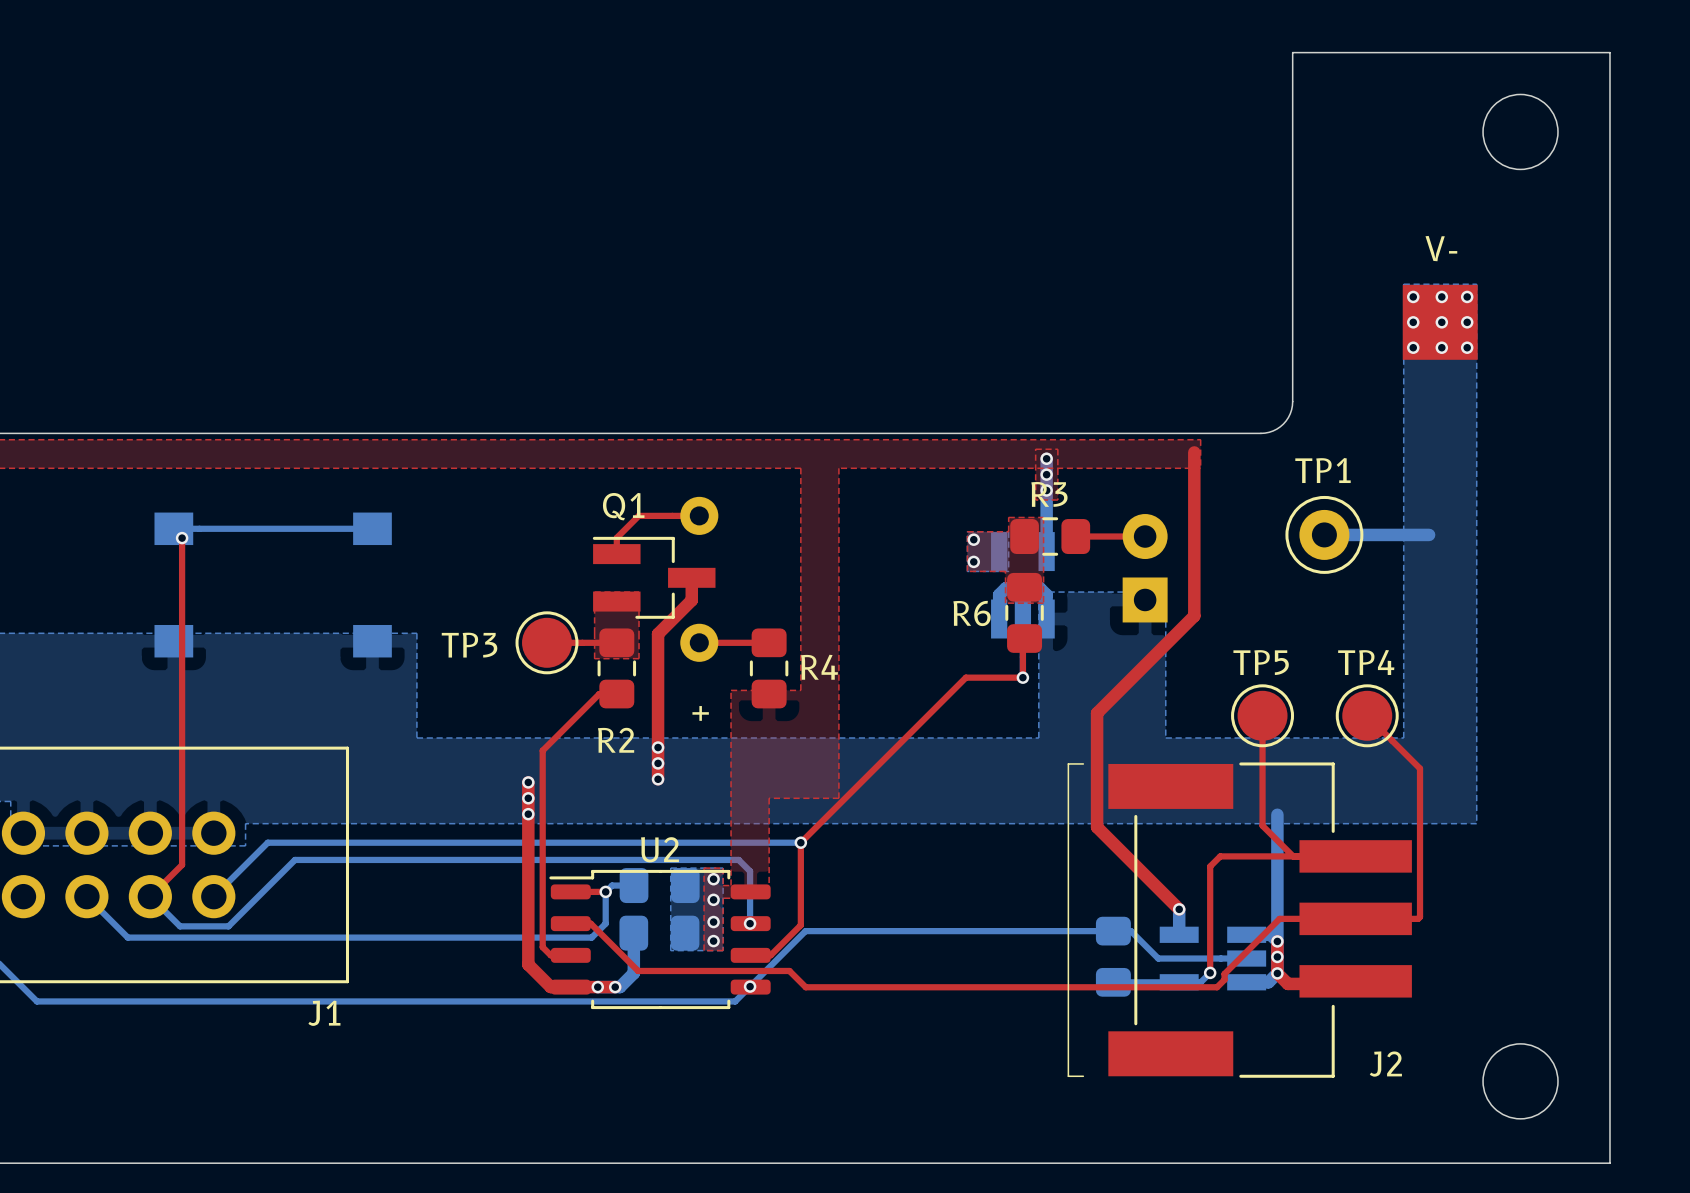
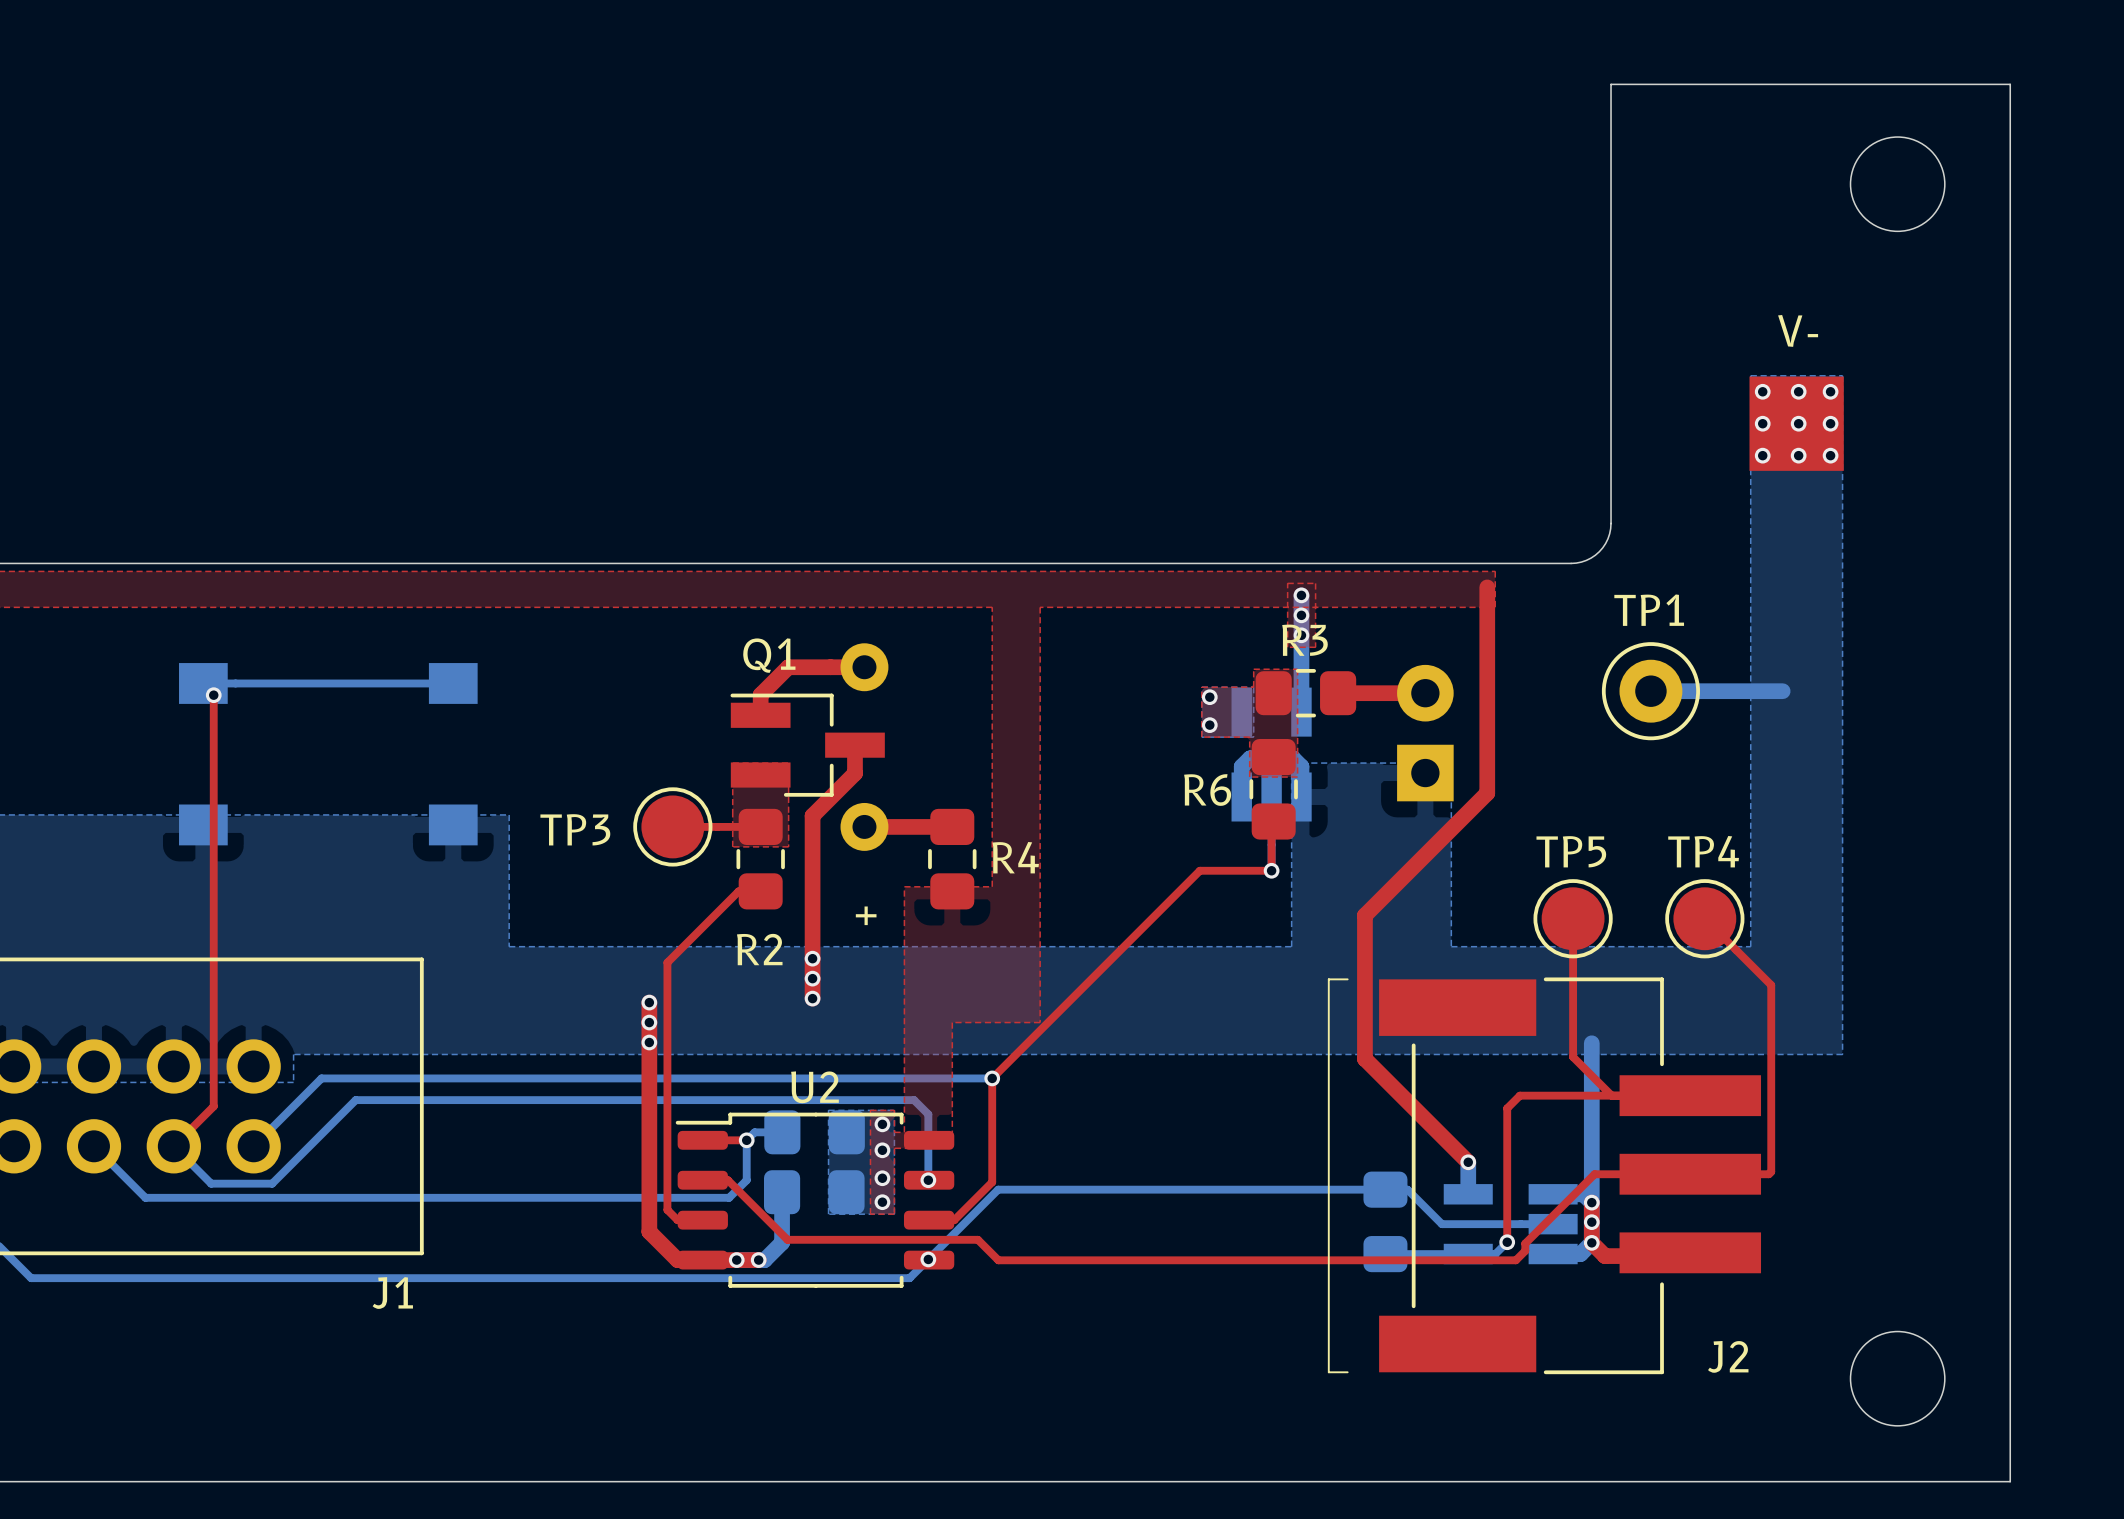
top track width: thin (699, 515) (638, 515) (616, 537) (616, 554) -> thick (864, 667) (788, 667) (760, 694) (760, 715)
top track width: thin (1075, 536) (1145, 536) -> thick (1338, 693) (1425, 693)
top track width: thin (699, 642) (769, 642) -> thick (864, 826) (952, 826)

